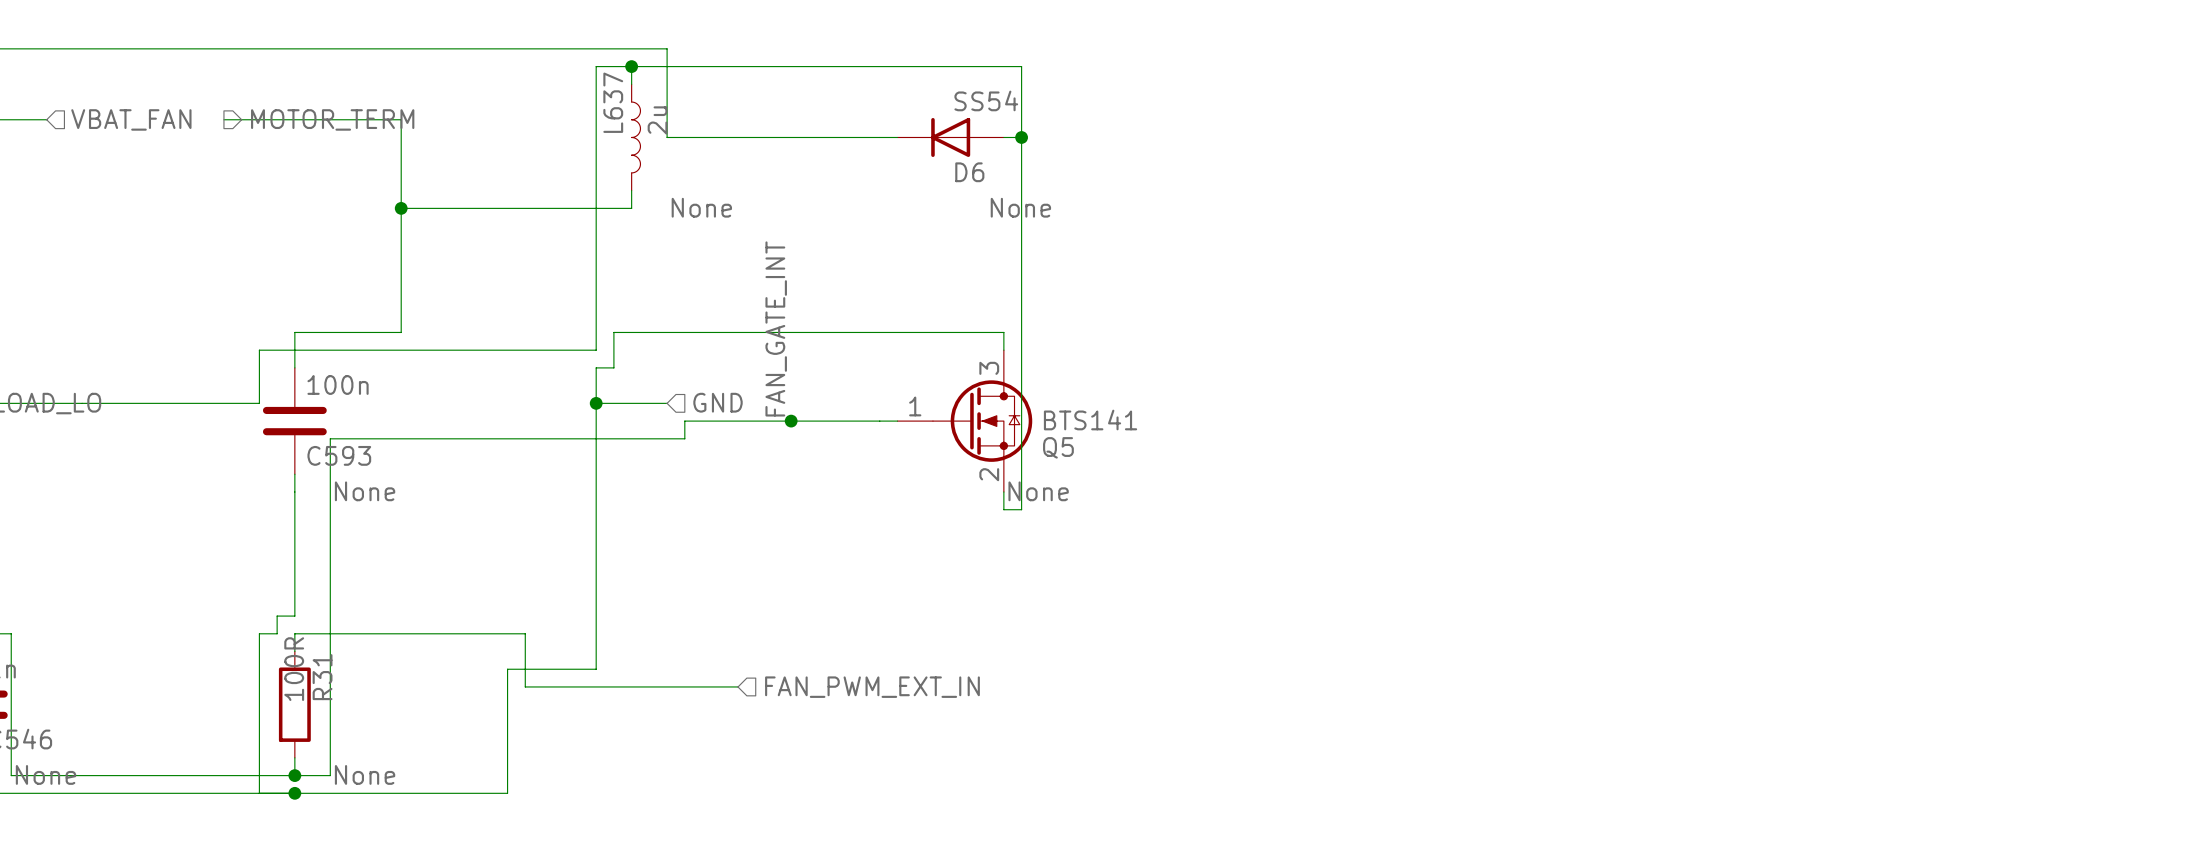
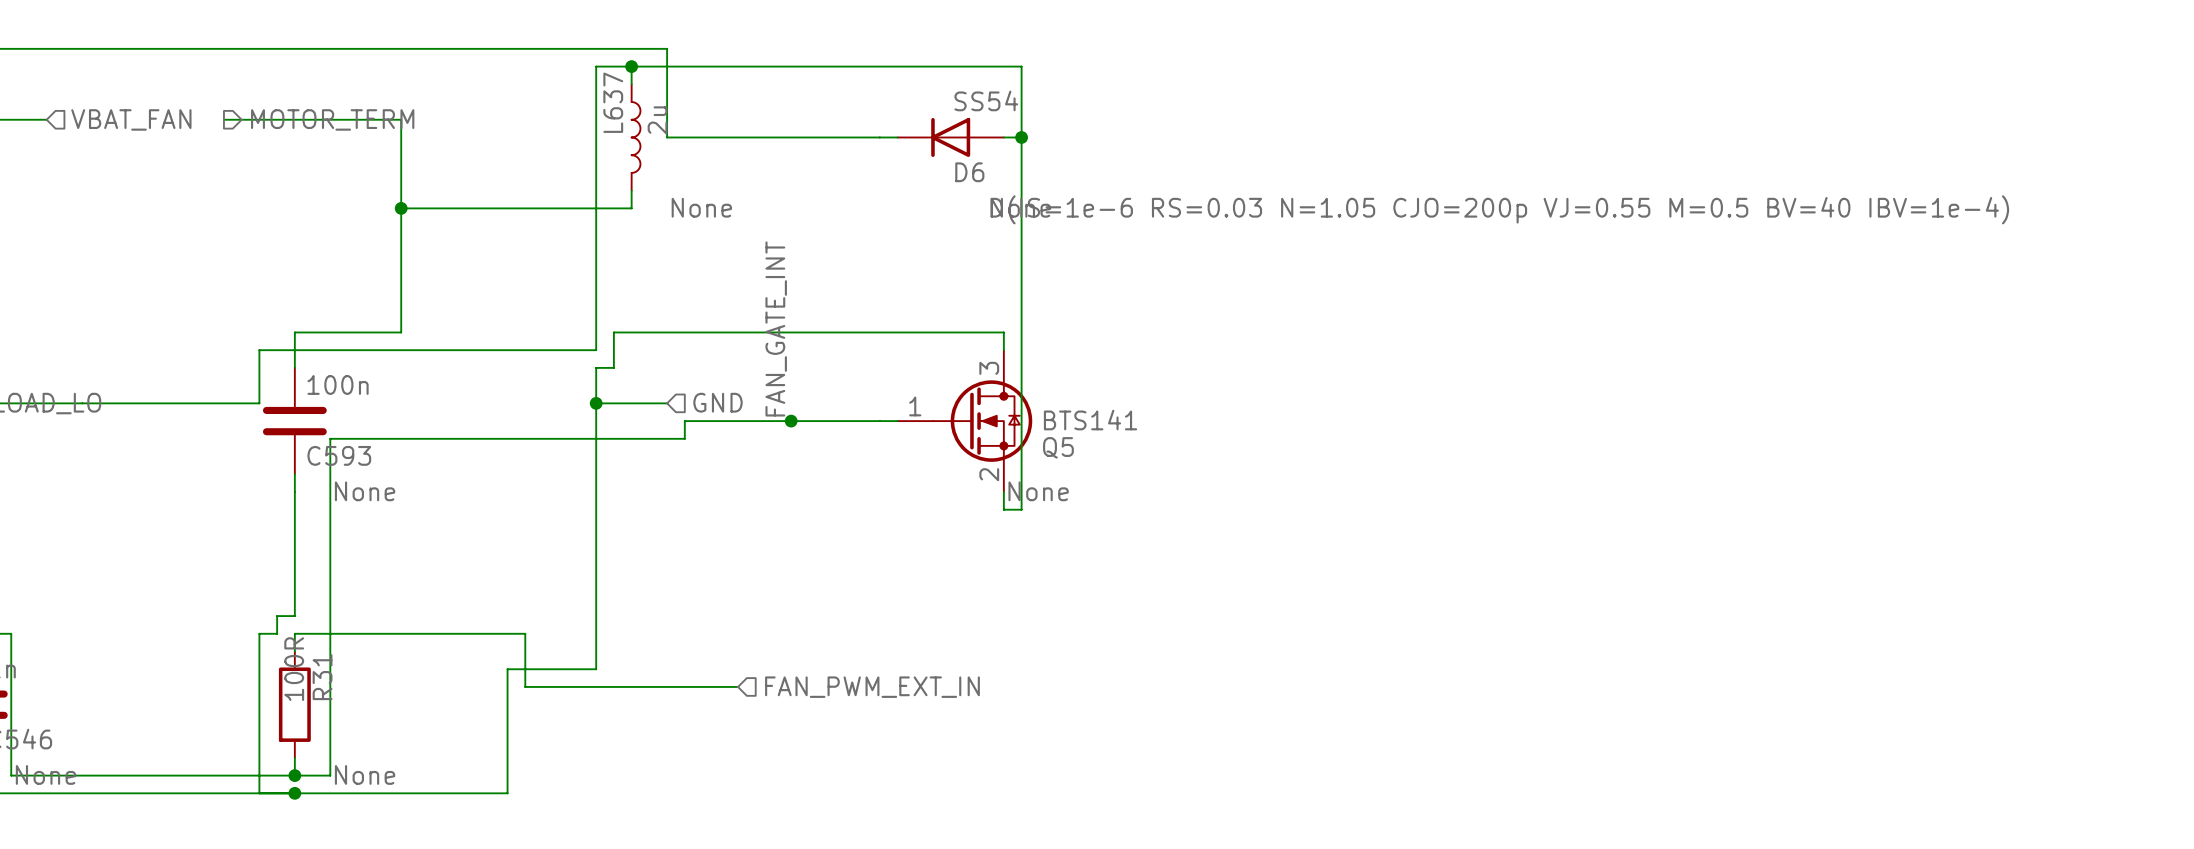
D6 text: none -> D(IS=1e-6 RS=0.03 N=1.05 CJO=200p VJ=0.55 M=0.5 BV=40 IBV=1e-4) (1499, 209)

